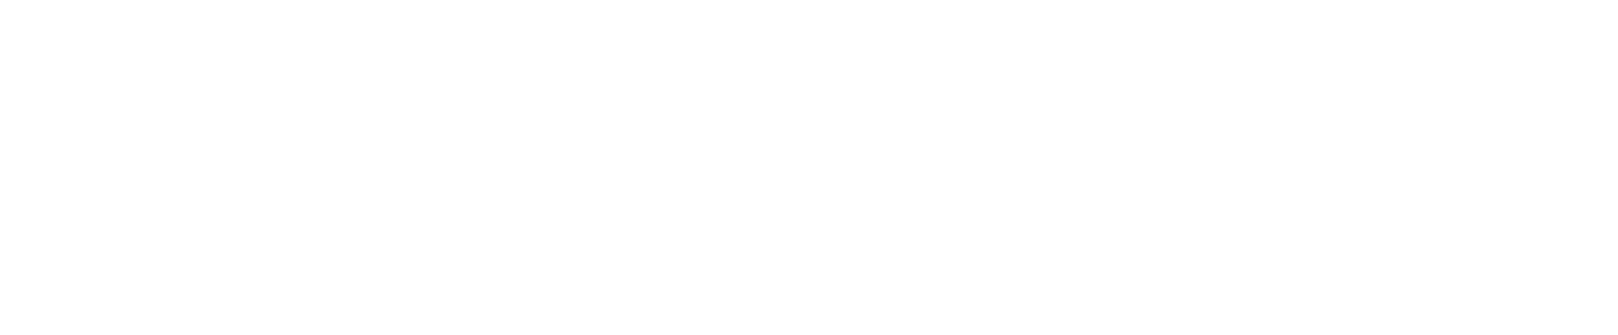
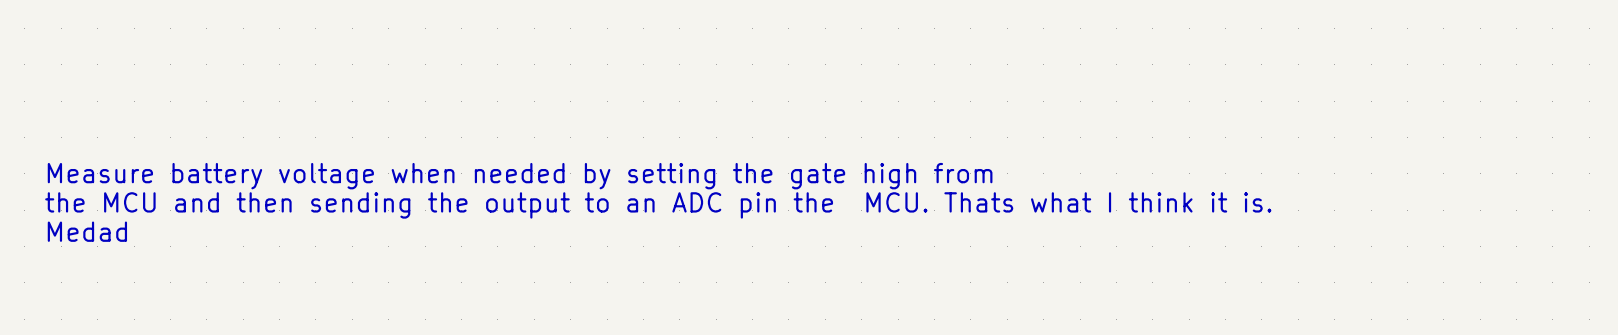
text: none -> Measure battery voltage when needed by setting the gate high from (520, 176)
text: none -> the MCU and then sending the output to an ADC pin the MCU. Thats what I think it is. (658, 205)
text: none -> Medad (87, 231)

